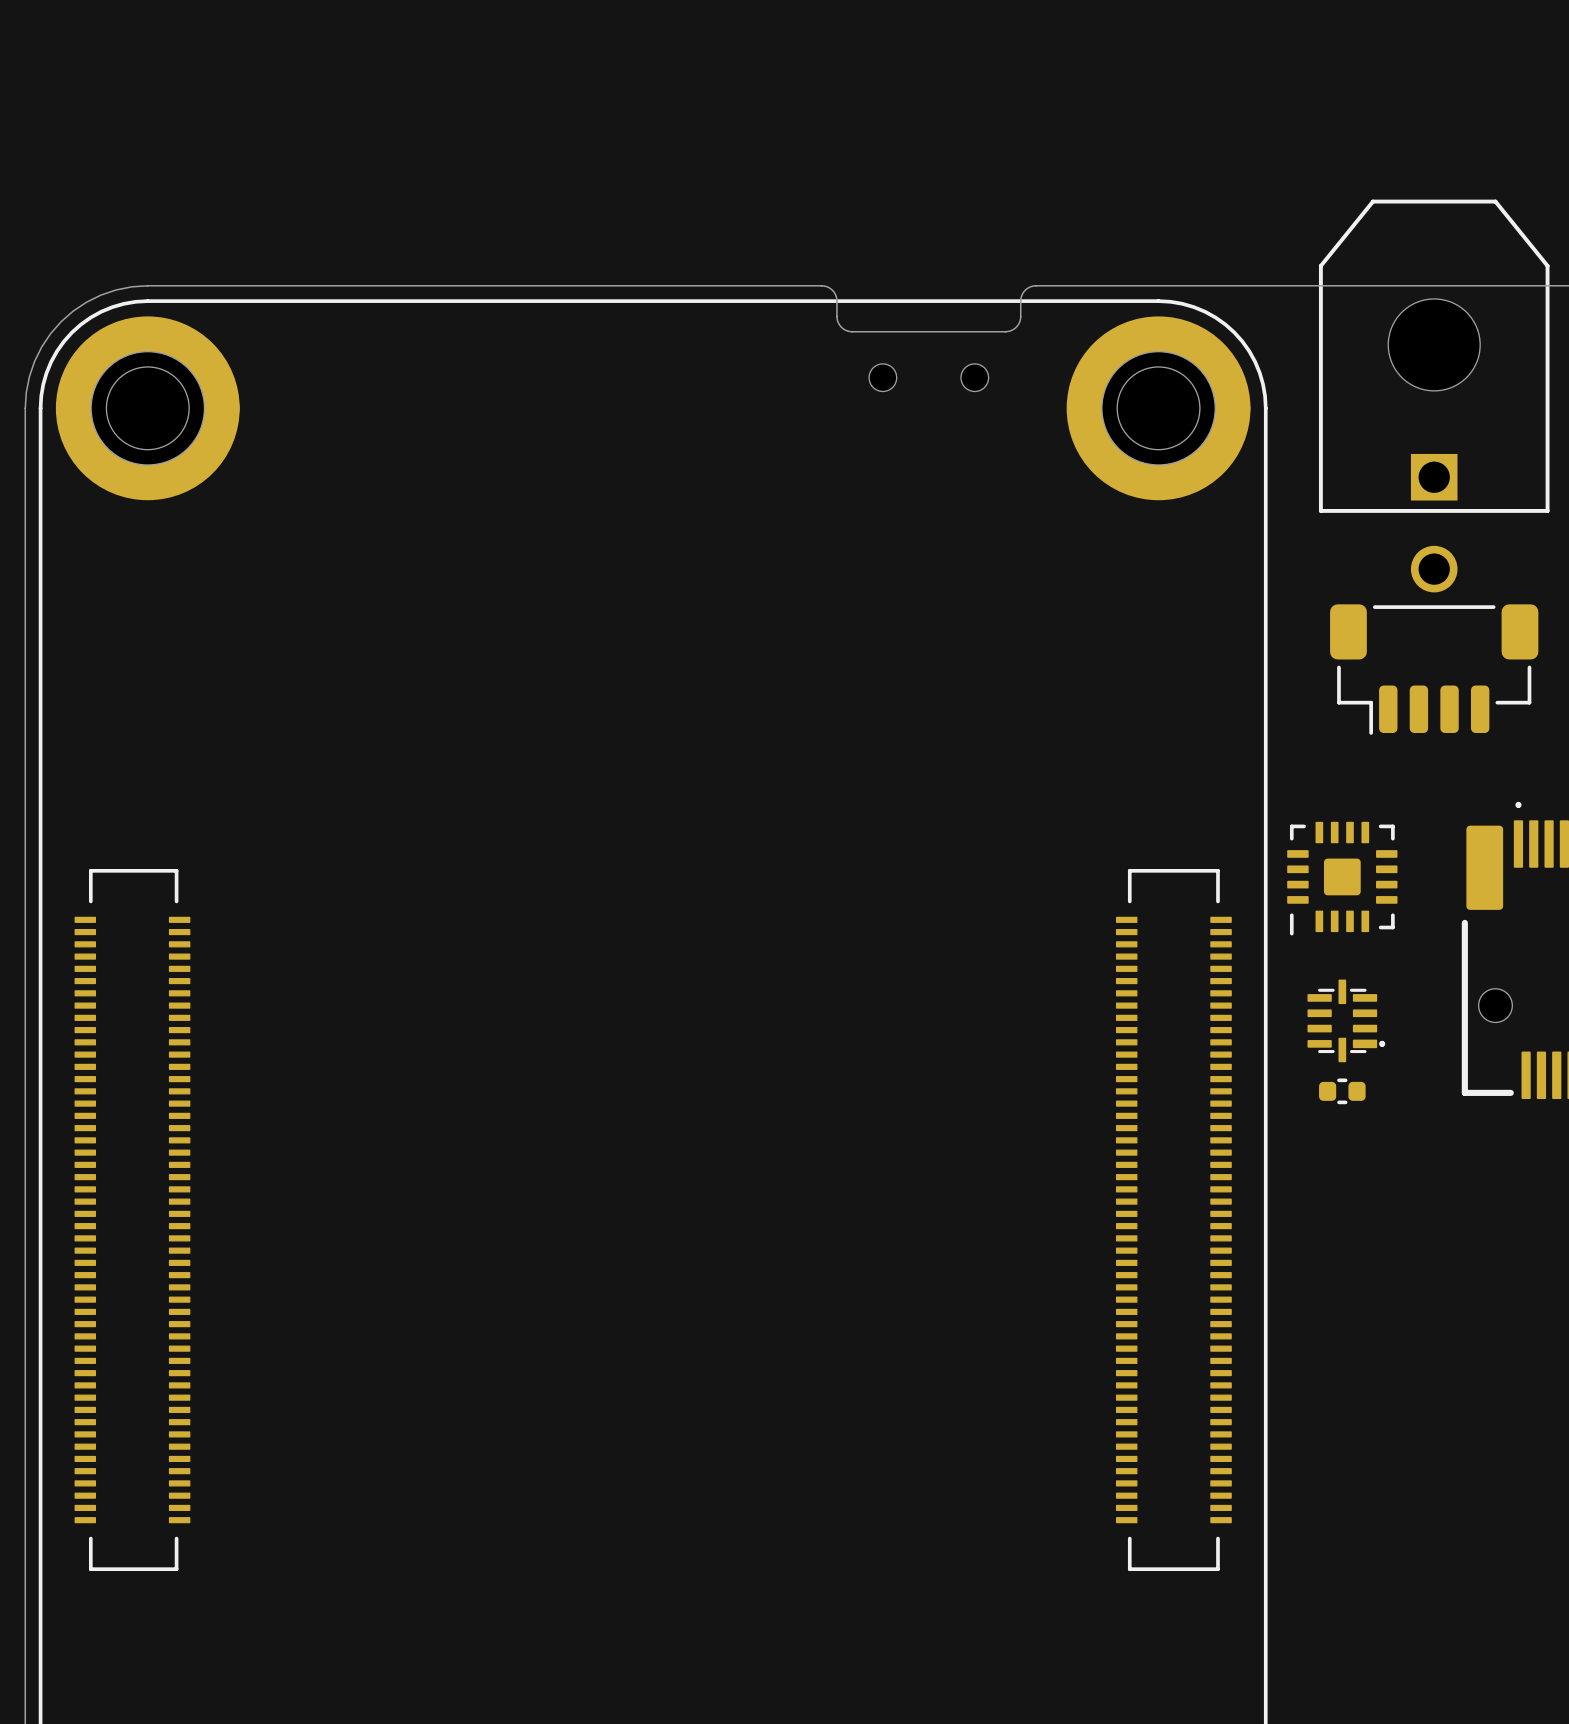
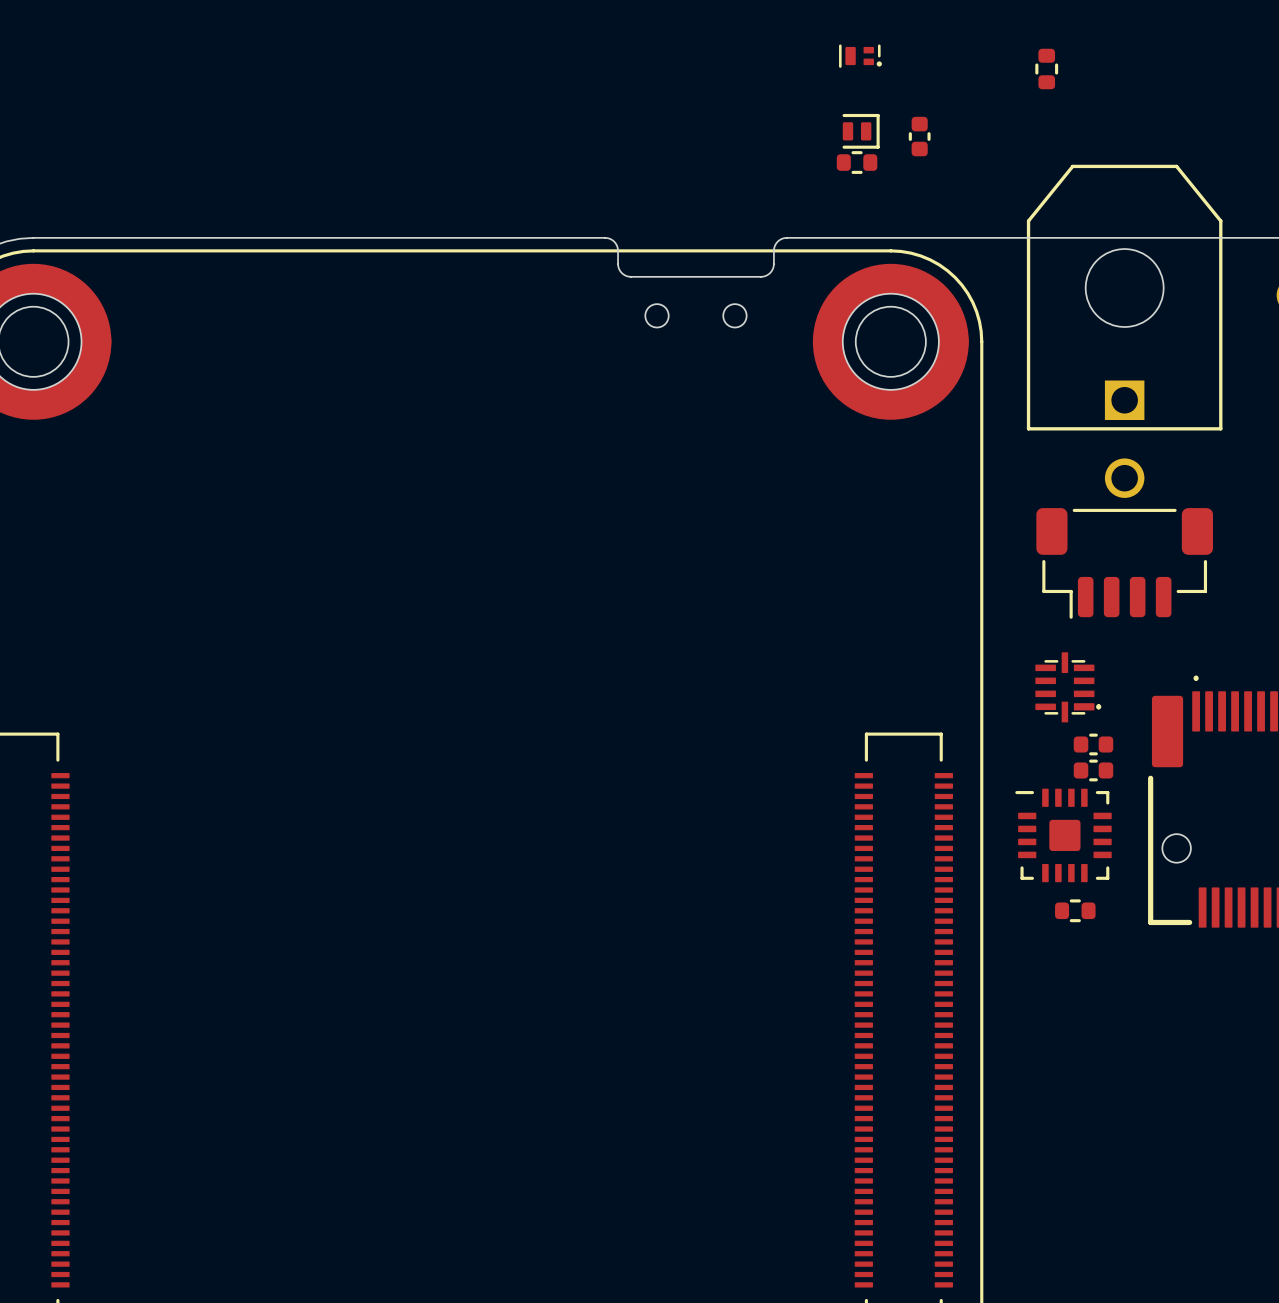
part: none -> (860, 56)
part: none -> (1046, 69)
part: none -> (861, 131)
part: none -> (919, 136)
part: none -> (857, 162)
part rotation: 0° (1342, 878) -> 90° clockwise (1063, 835)
part position: (1342, 878) -> (1063, 835)
part: none -> (1093, 744)
part: none -> (1093, 770)
part position: (1346, 1020) -> (1068, 687)
part: none -> (1075, 910)
part: (1342, 1091) -> none

